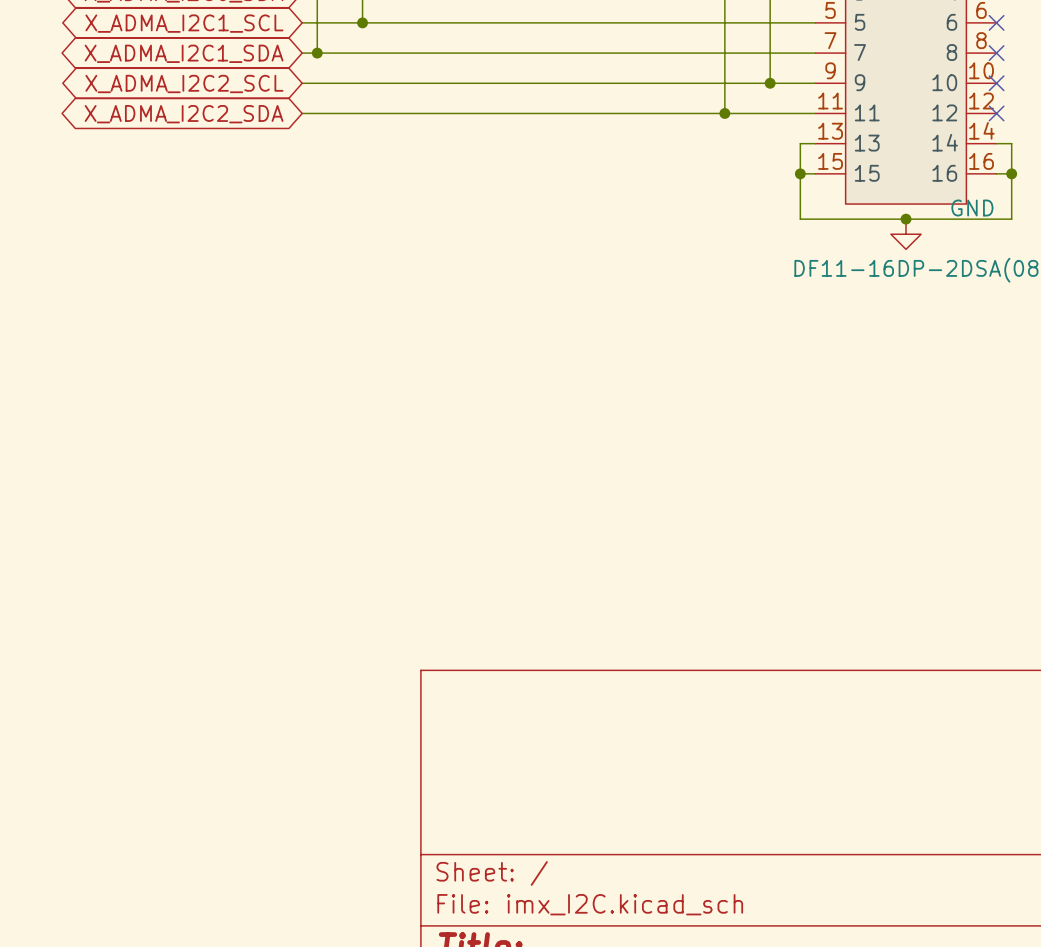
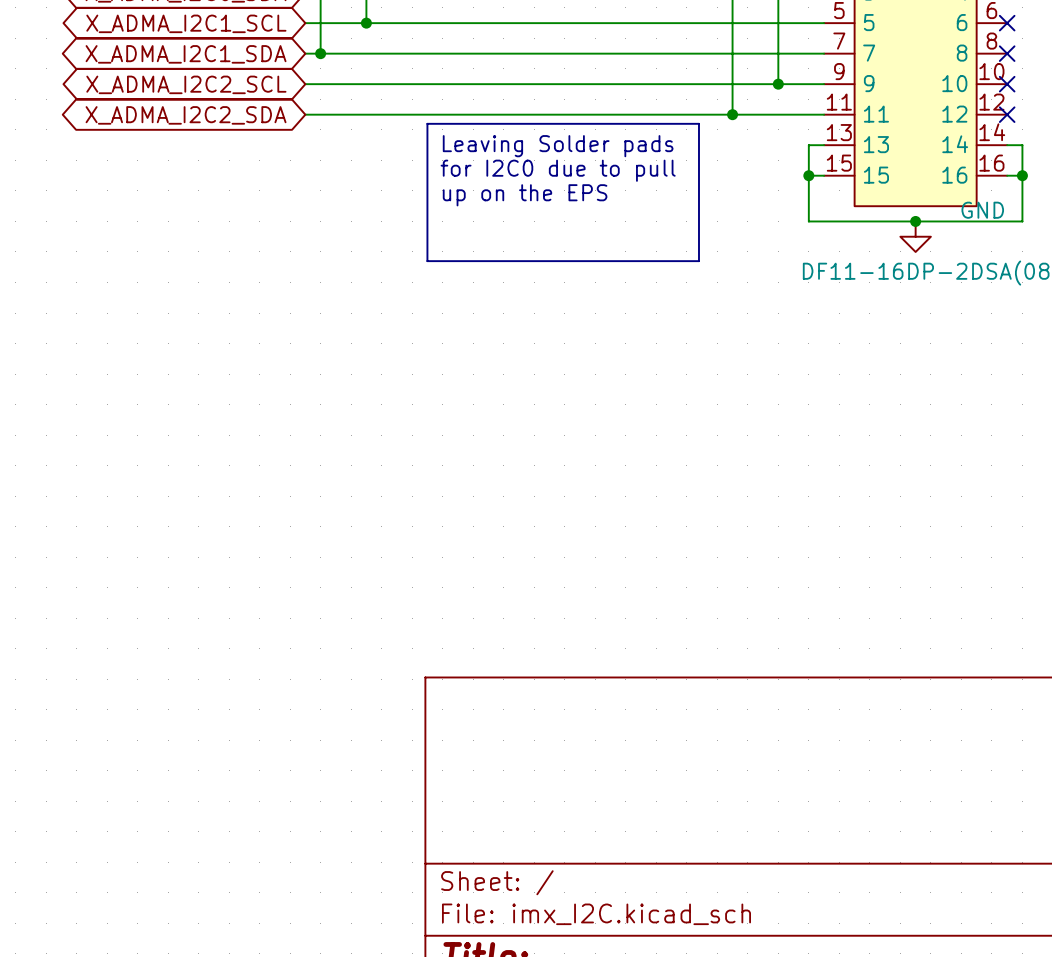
line: none -> (427, 123) (698, 123) (698, 261) (427, 261) (427, 123)
text: none -> Leaving Solder pads (558, 146)
text: none -> for I2C0 due to pull (558, 170)
text: none -> up on the EPS (525, 195)

